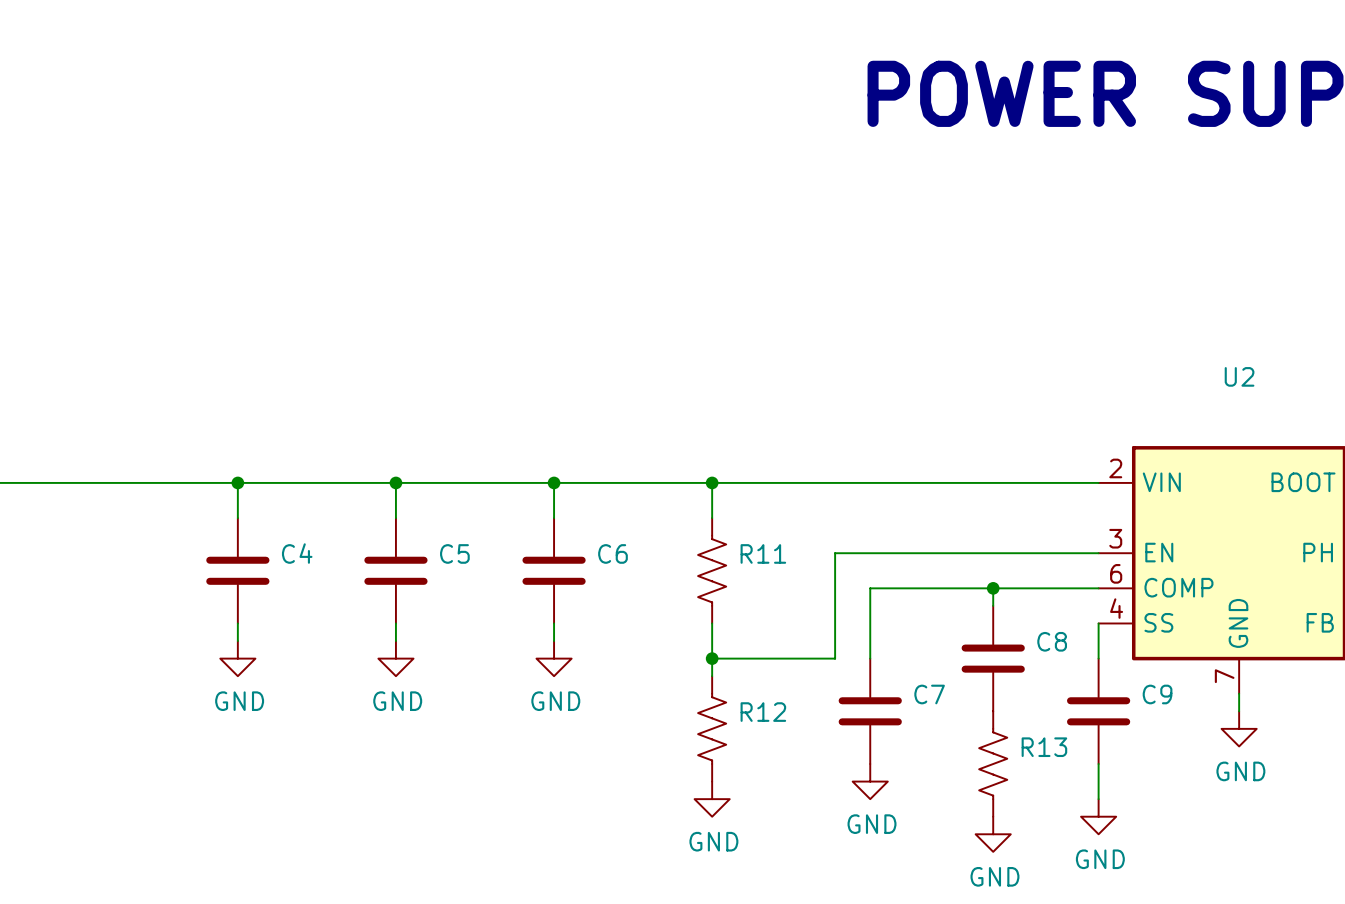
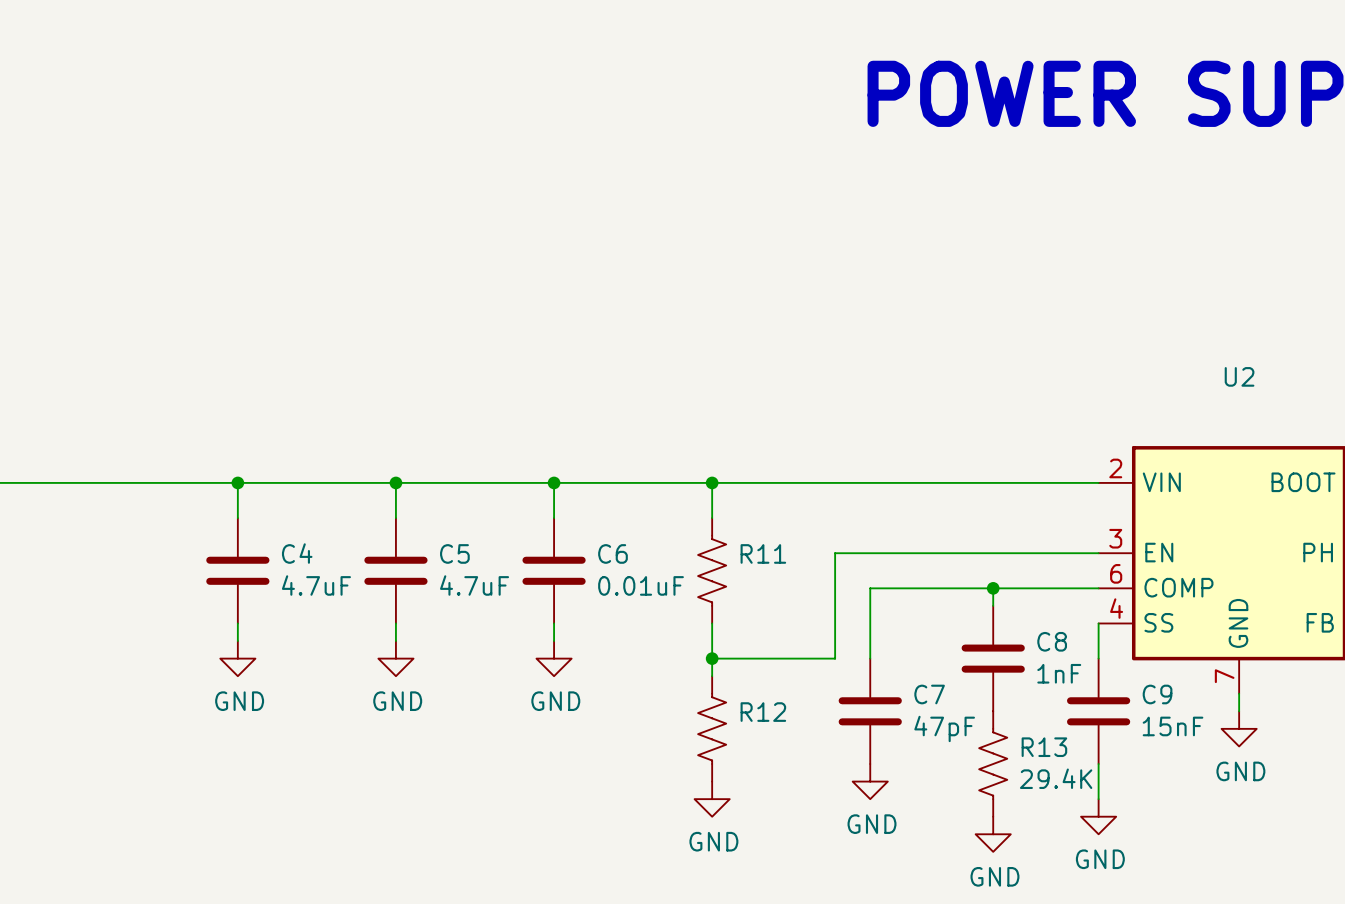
C4 value: none -> 4.7uF (316, 585)
C5 value: none -> 4.7uF (474, 585)
C6 value: none -> 0.01uF (641, 585)
C8 value: none -> 1nF (1059, 673)
C9 value: none -> 15nF (1173, 726)
C7 value: none -> 47pF (944, 728)
R13 value: none -> 29.4K (1056, 778)

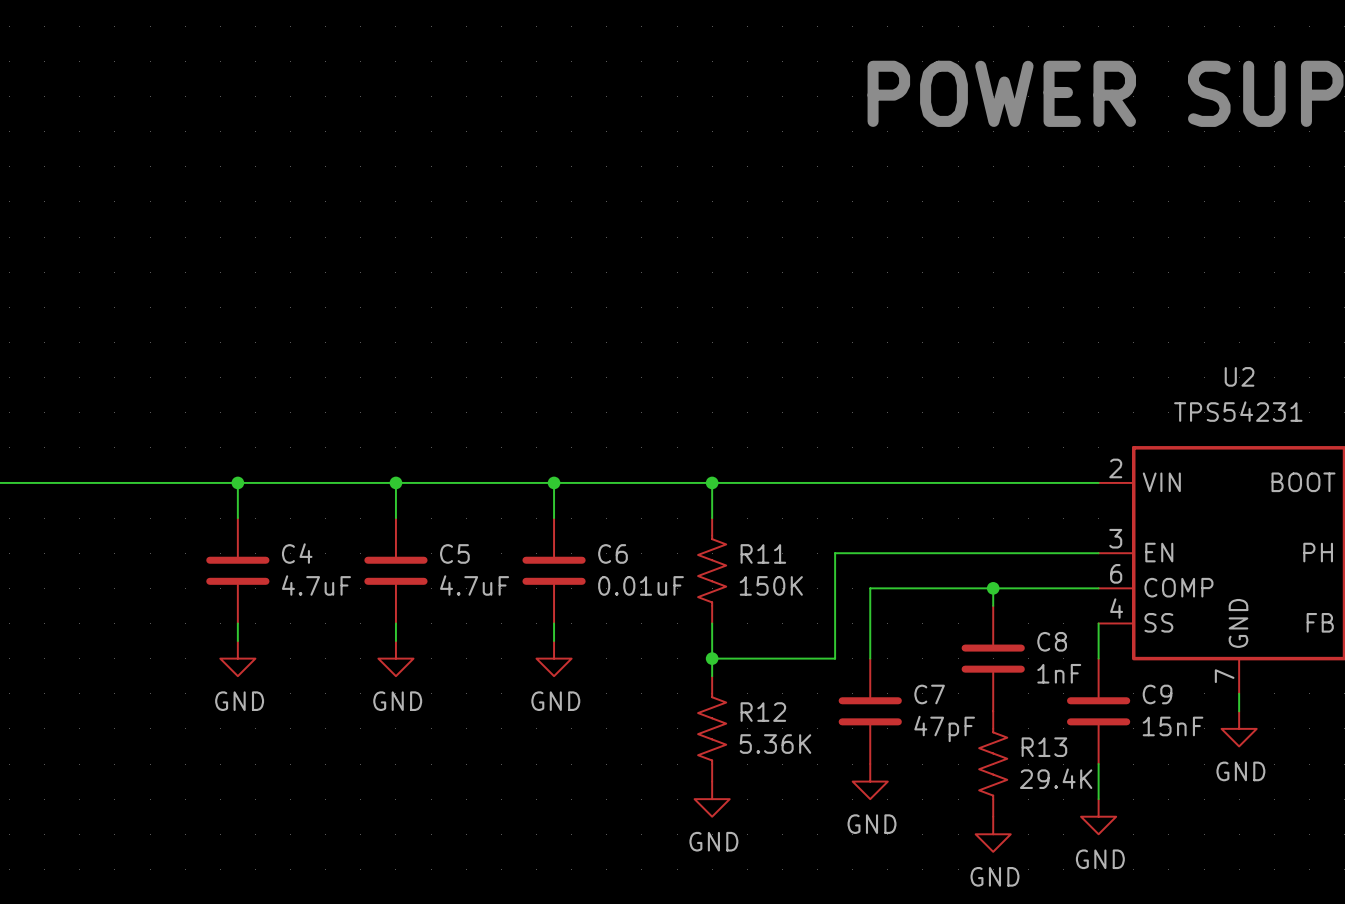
U2 value: none -> TPS54231 (1238, 411)
R11 value: none -> 150K (771, 585)
R12 value: none -> 5.36K (775, 744)

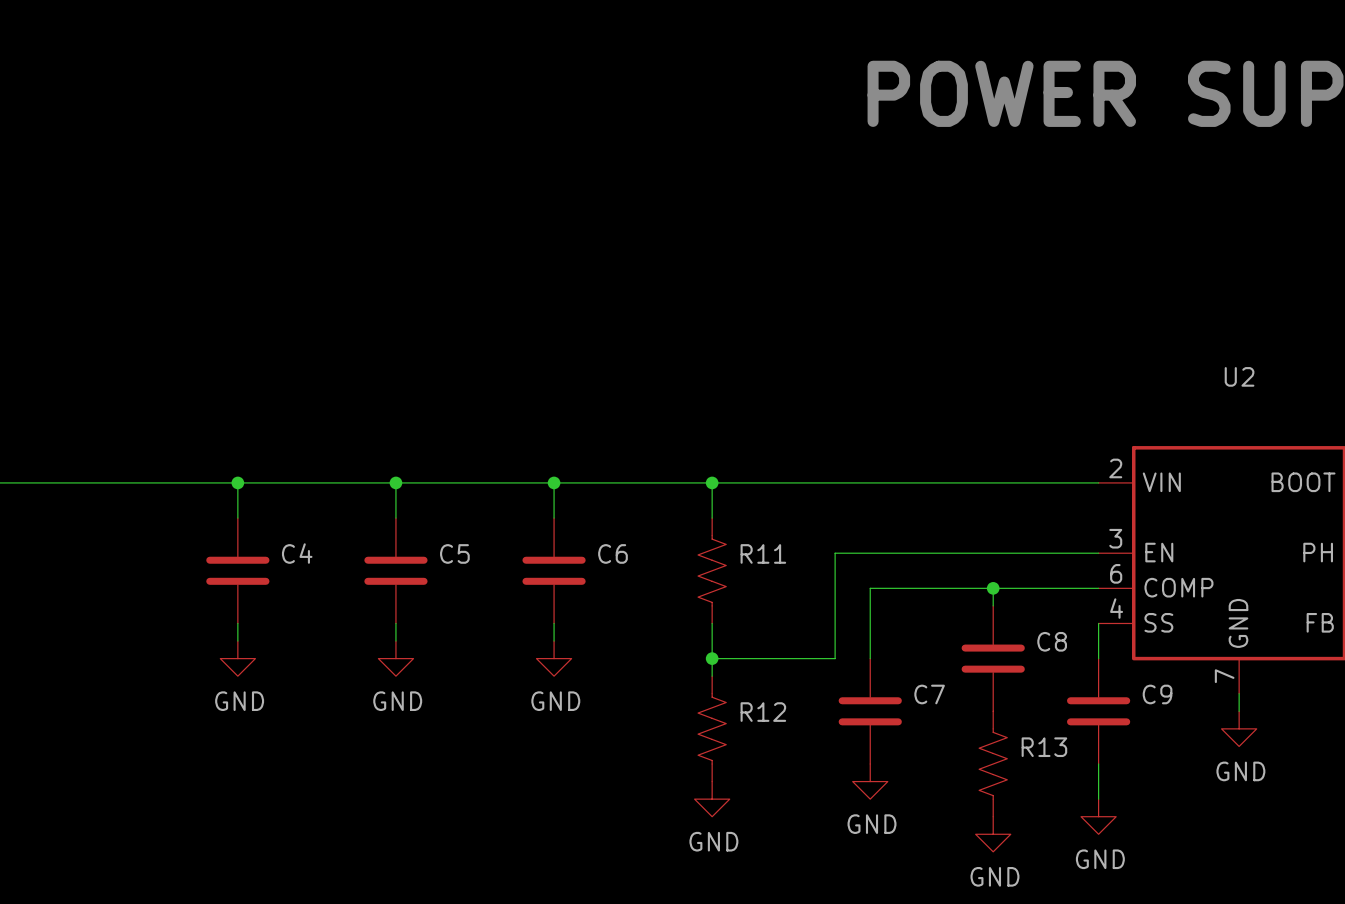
U2 value: TPS54231 (1238, 411) -> none
C4 value: 4.7uF (316, 585) -> none
C5 value: 4.7uF (474, 585) -> none
C6 value: 0.01uF (641, 585) -> none
R11 value: 150K (771, 585) -> none
C8 value: 1nF (1059, 673) -> none
C9 value: 15nF (1173, 726) -> none
C7 value: 47pF (944, 728) -> none
R12 value: 5.36K (775, 744) -> none
R13 value: 29.4K (1056, 778) -> none

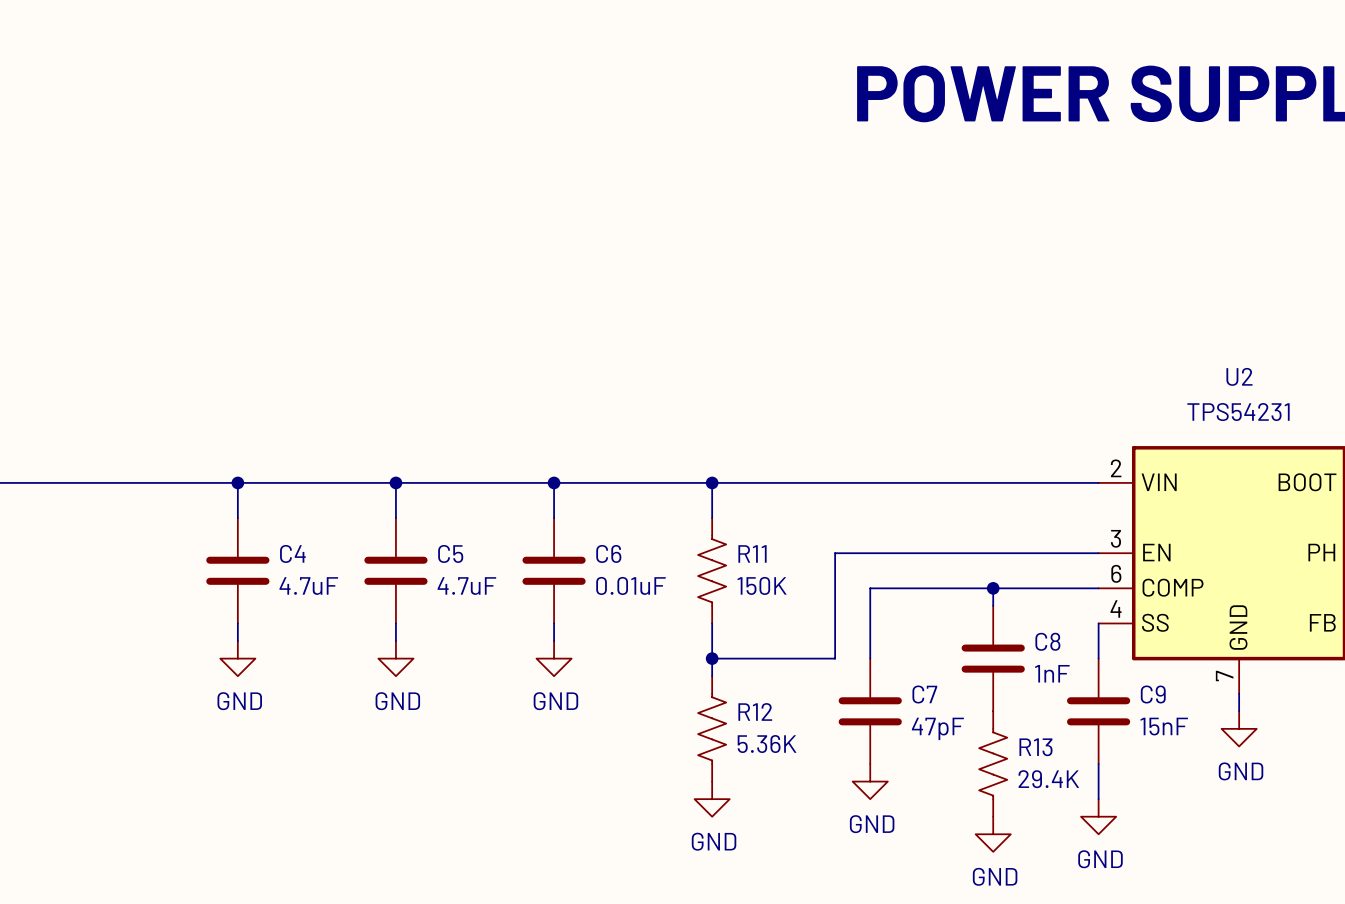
U2 value: none -> TPS54231 (1238, 412)
C4 value: none -> 4.7uF (308, 586)
C5 value: none -> 4.7uF (466, 586)
C6 value: none -> 0.01uF (630, 585)
R11 value: none -> 150K (762, 585)
C8 value: none -> 1nF (1052, 673)
C9 value: none -> 15nF (1164, 726)
C7 value: none -> 47pF (937, 728)
R12 value: none -> 5.36K (767, 744)
R13 value: none -> 29.4K (1048, 779)

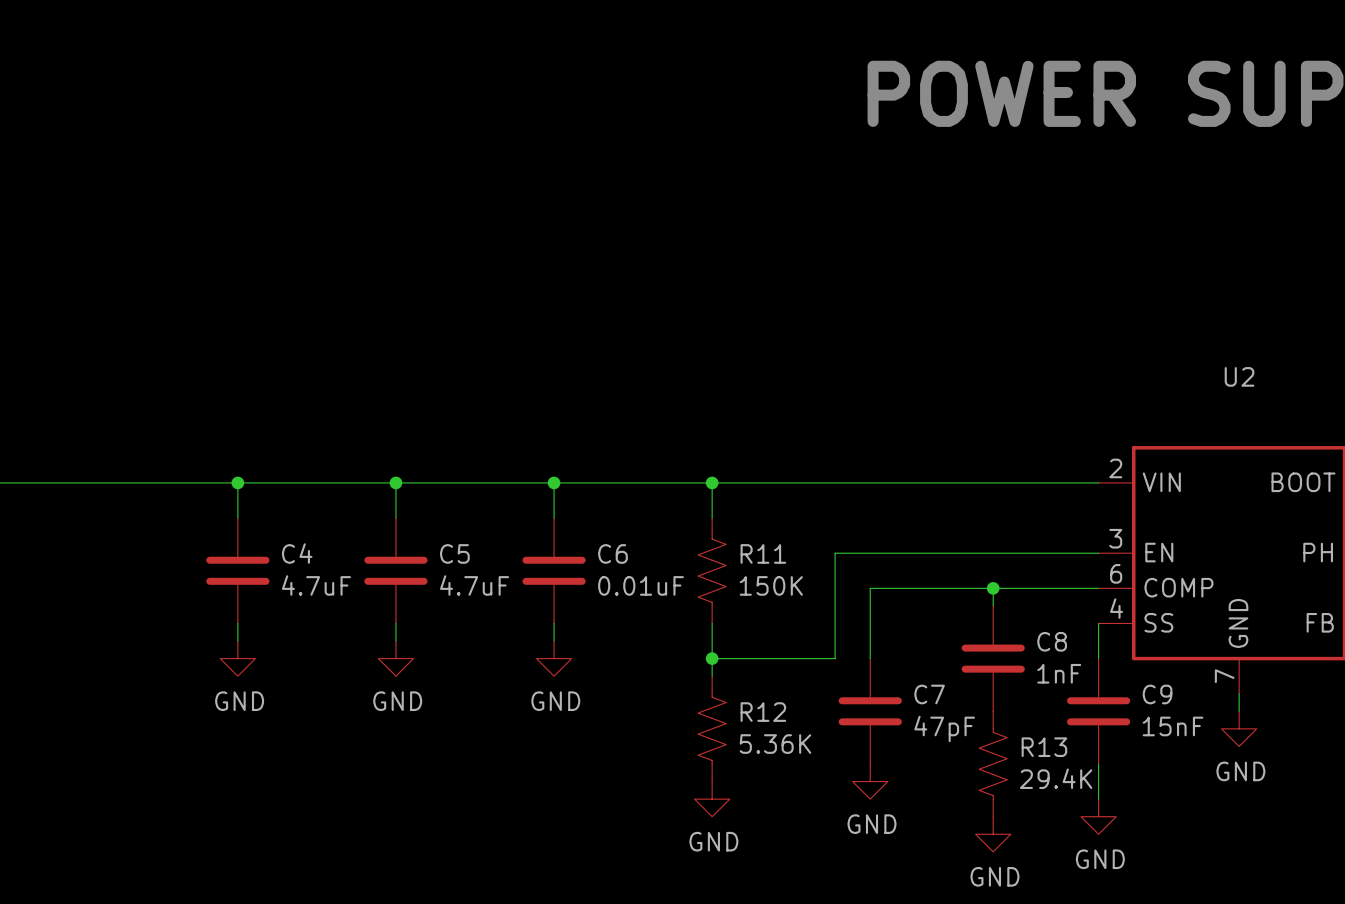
U2 value: TPS54231 (1238, 412) -> none

